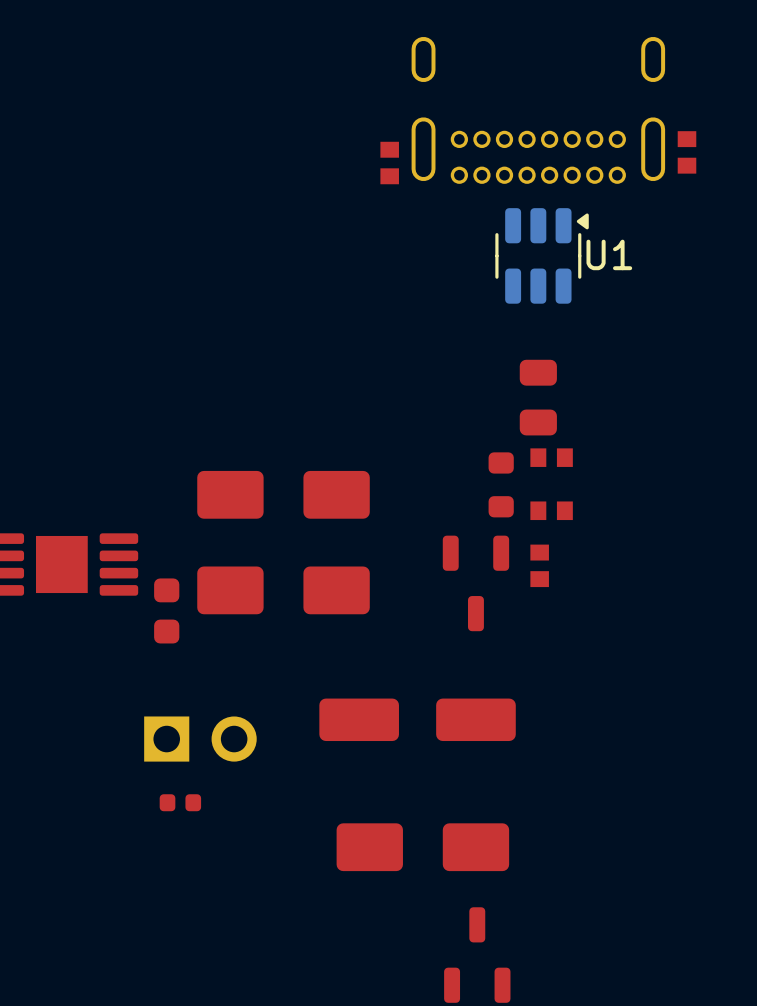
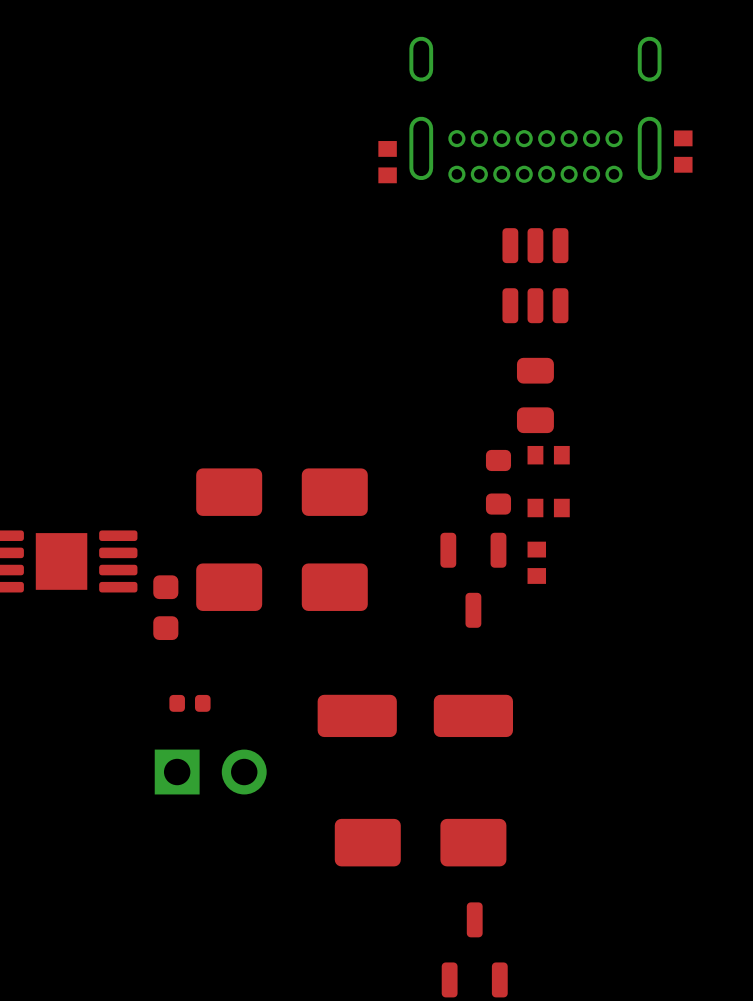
U1 side: bottom (542, 255) -> top (535, 275)
part position: (200, 739) -> (210, 772)
part position: (180, 802) -> (189, 703)

